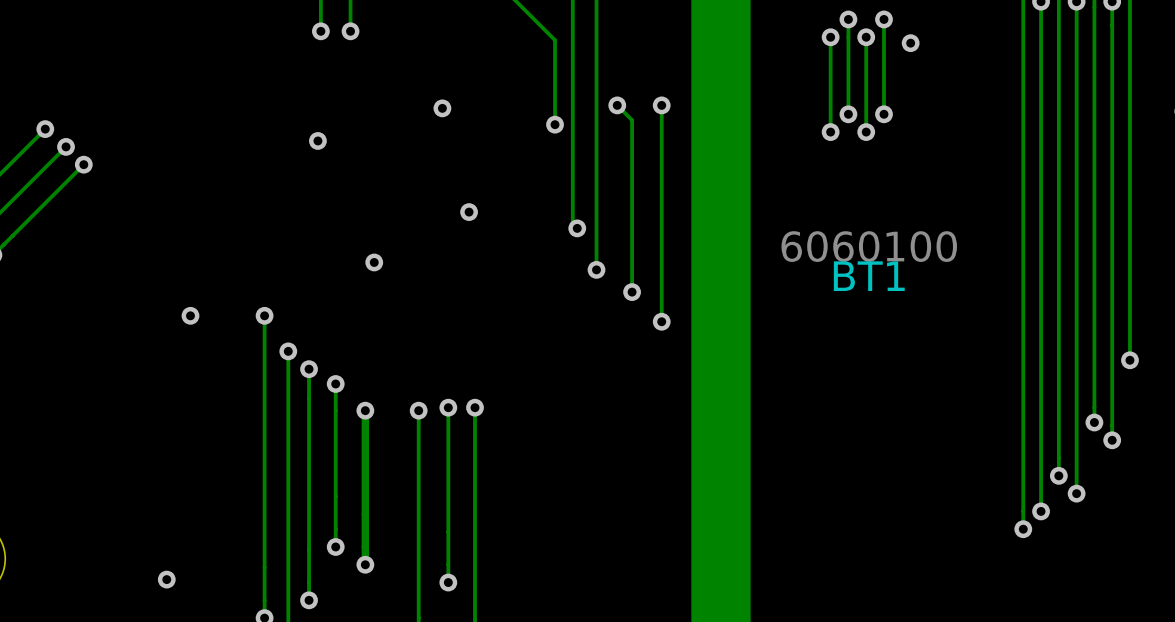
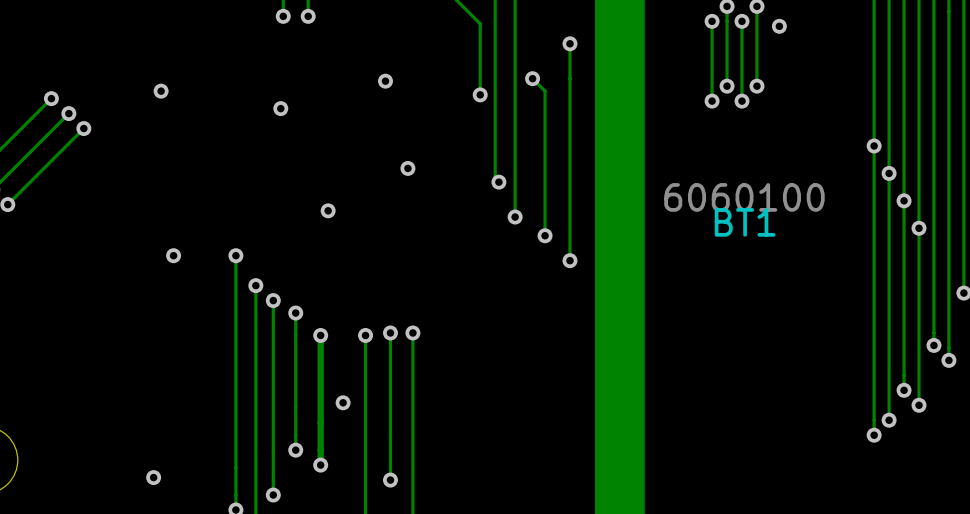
track: none -> (569, 43) (569, 78)
via position: (661, 105) -> (569, 43)
via: none -> (161, 91)
via: none -> (874, 145)
via: none -> (889, 173)
via: none -> (904, 200)
via: none -> (919, 228)
via: none -> (343, 402)

